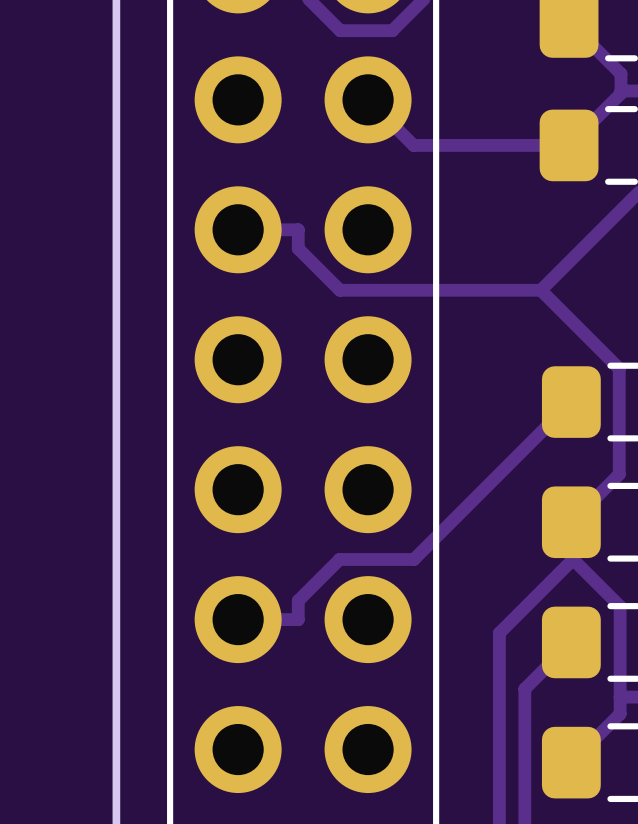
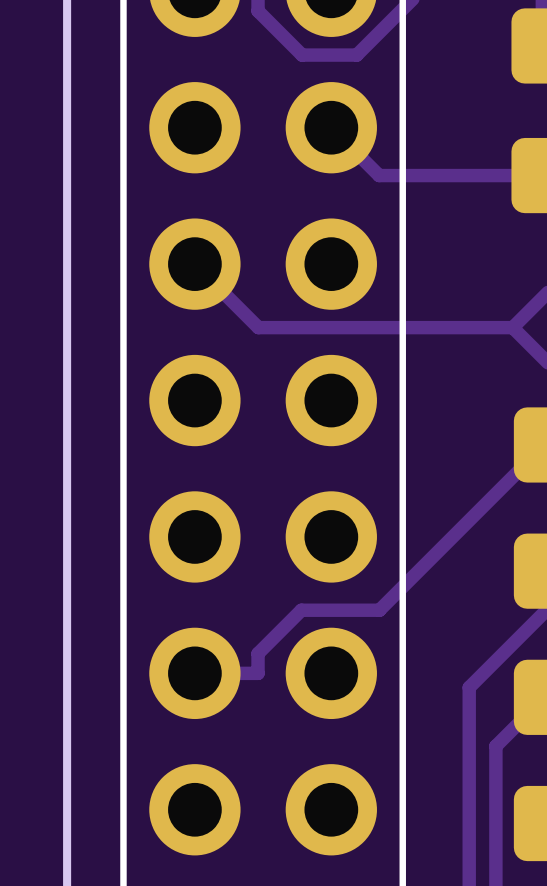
track: (238, 229) (298, 229) (298, 248) (339, 290) -> (194, 264) (258, 327) (301, 327)

